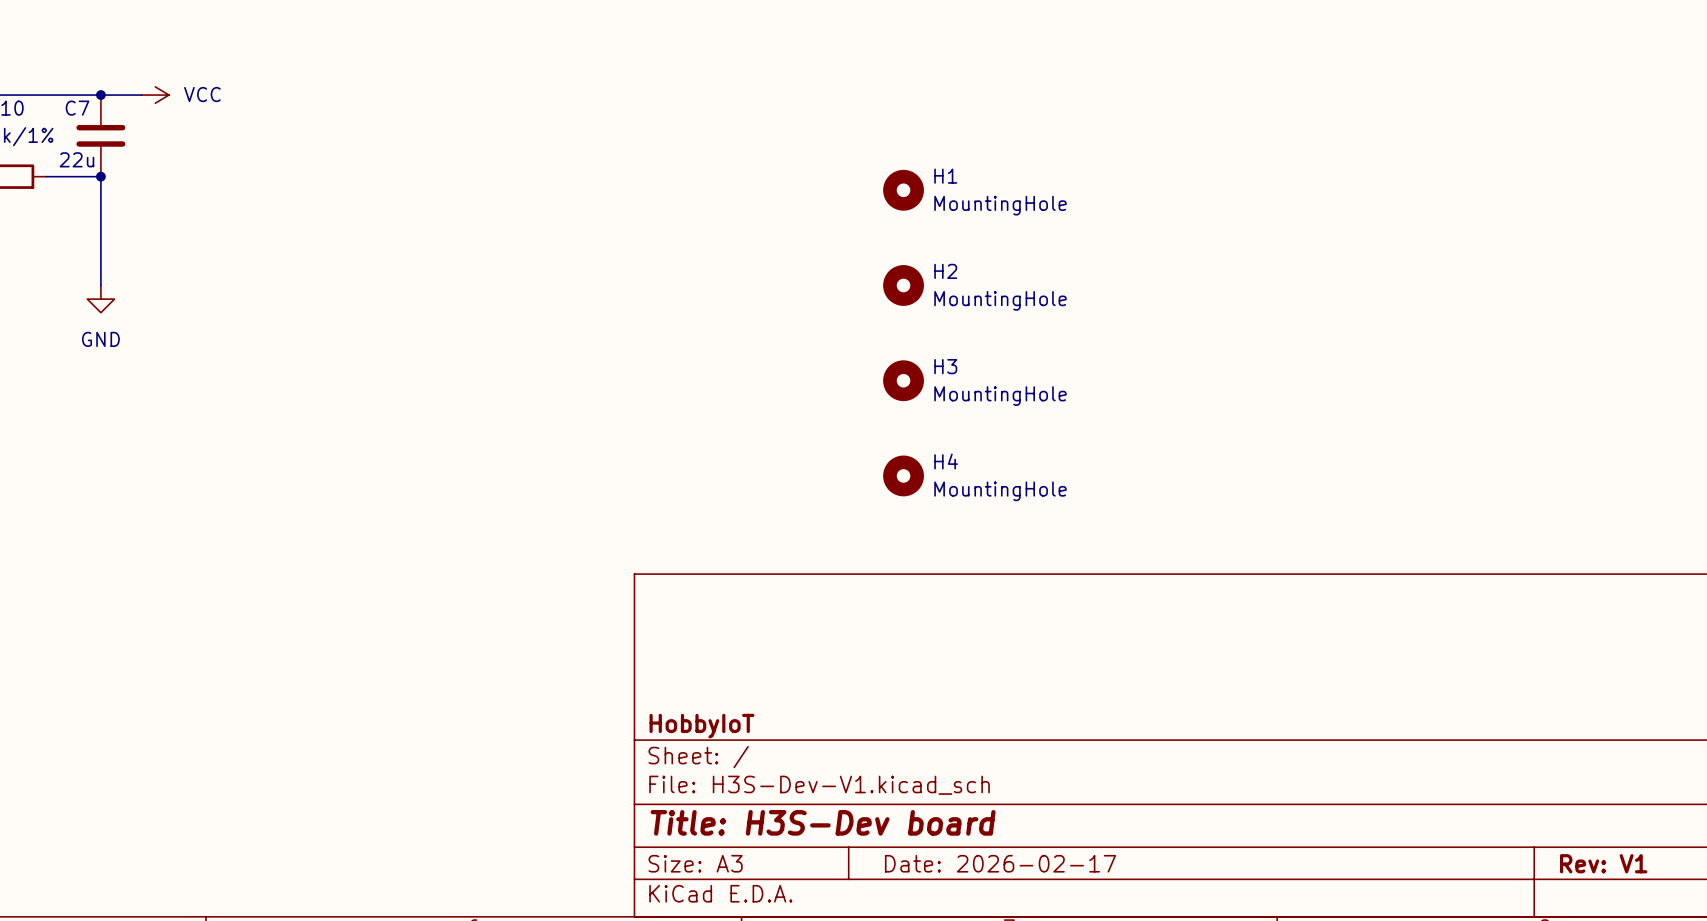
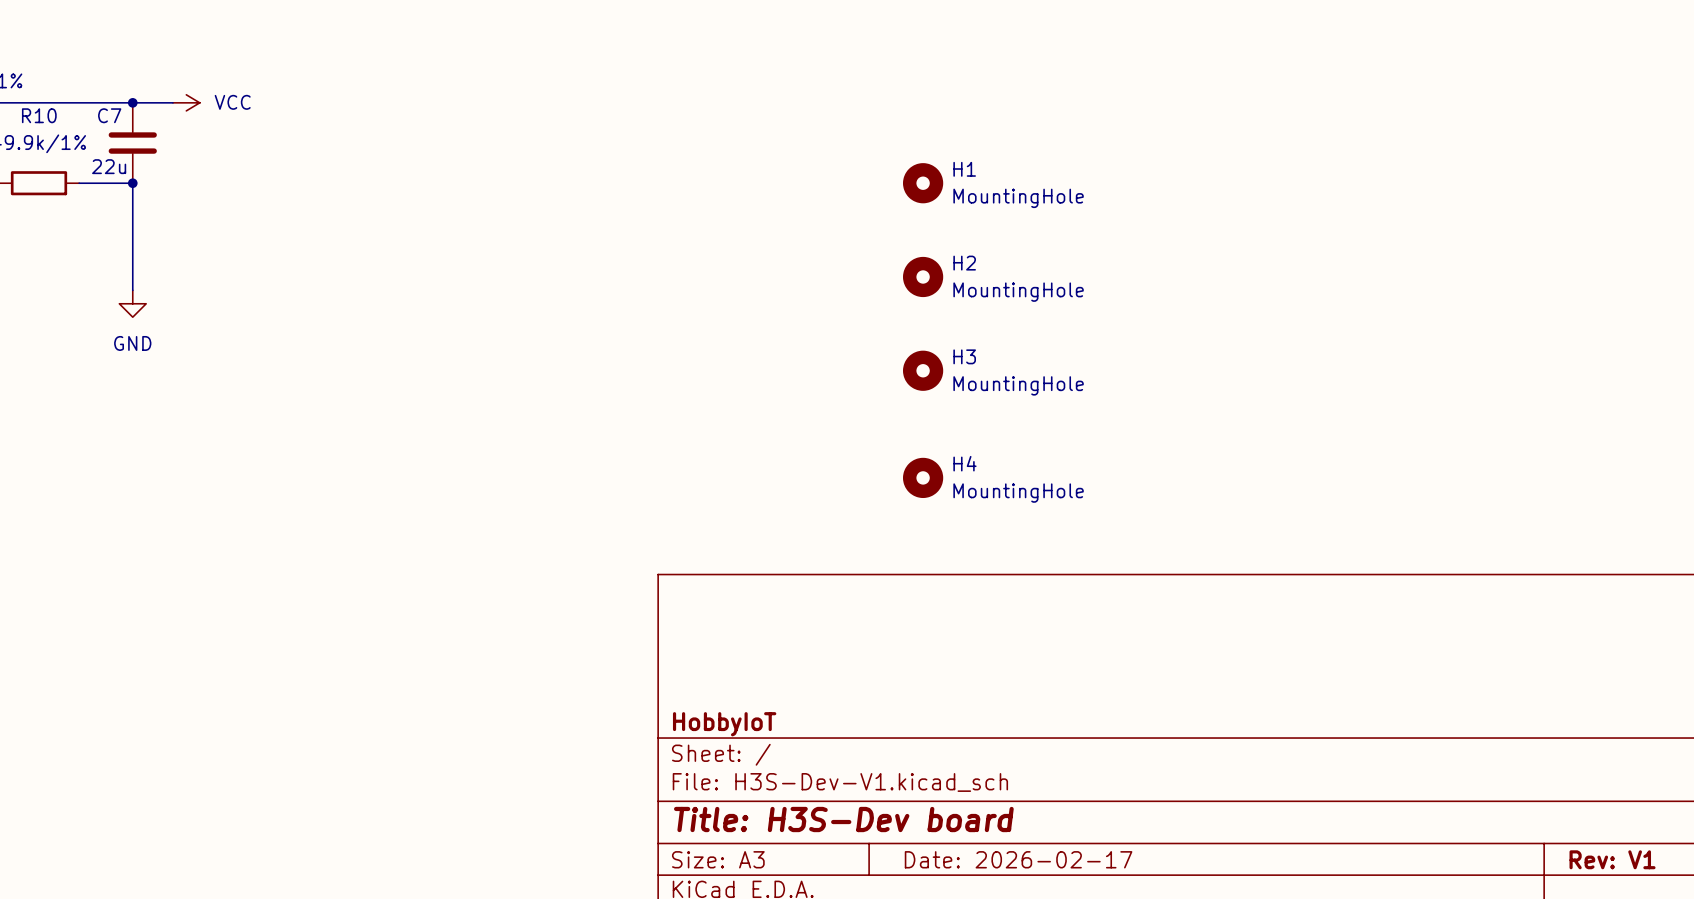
H1 position: (903, 190) -> (923, 183)
H2 position: (903, 285) -> (923, 276)
H3 position: (903, 380) -> (923, 370)

